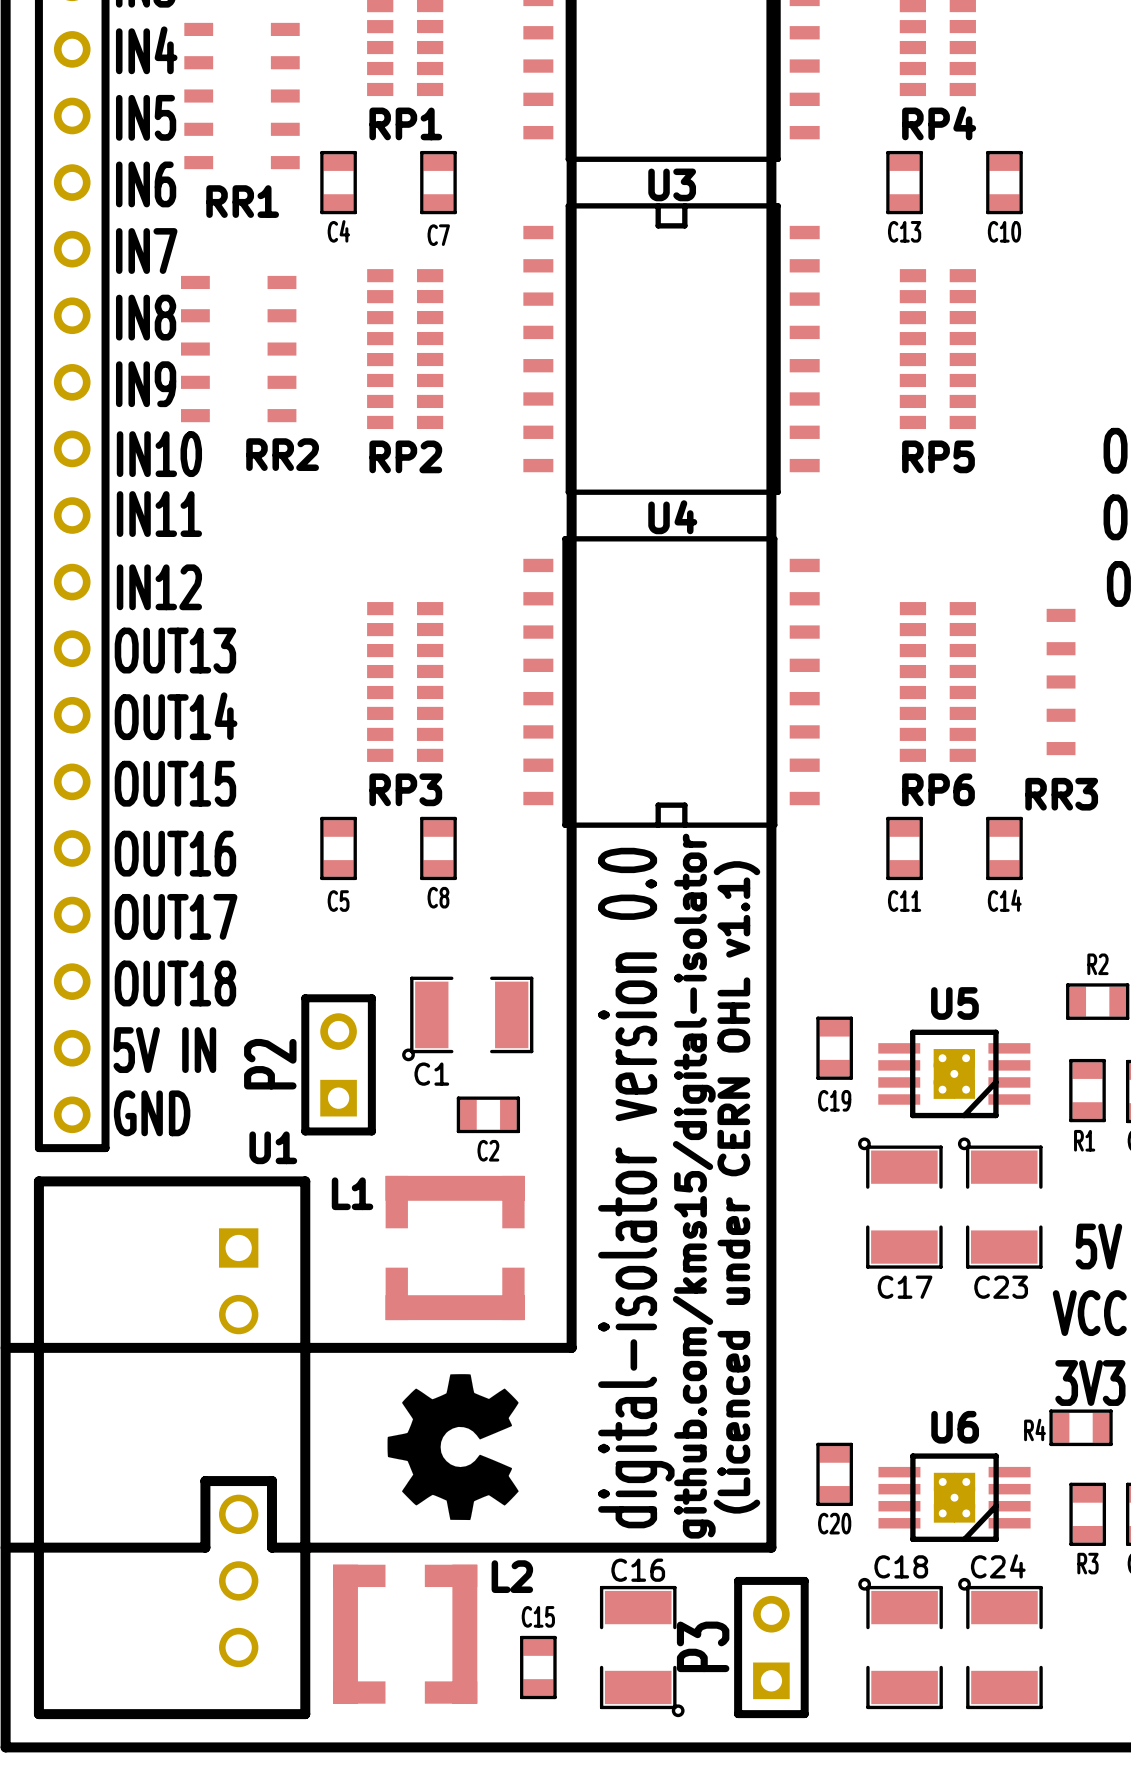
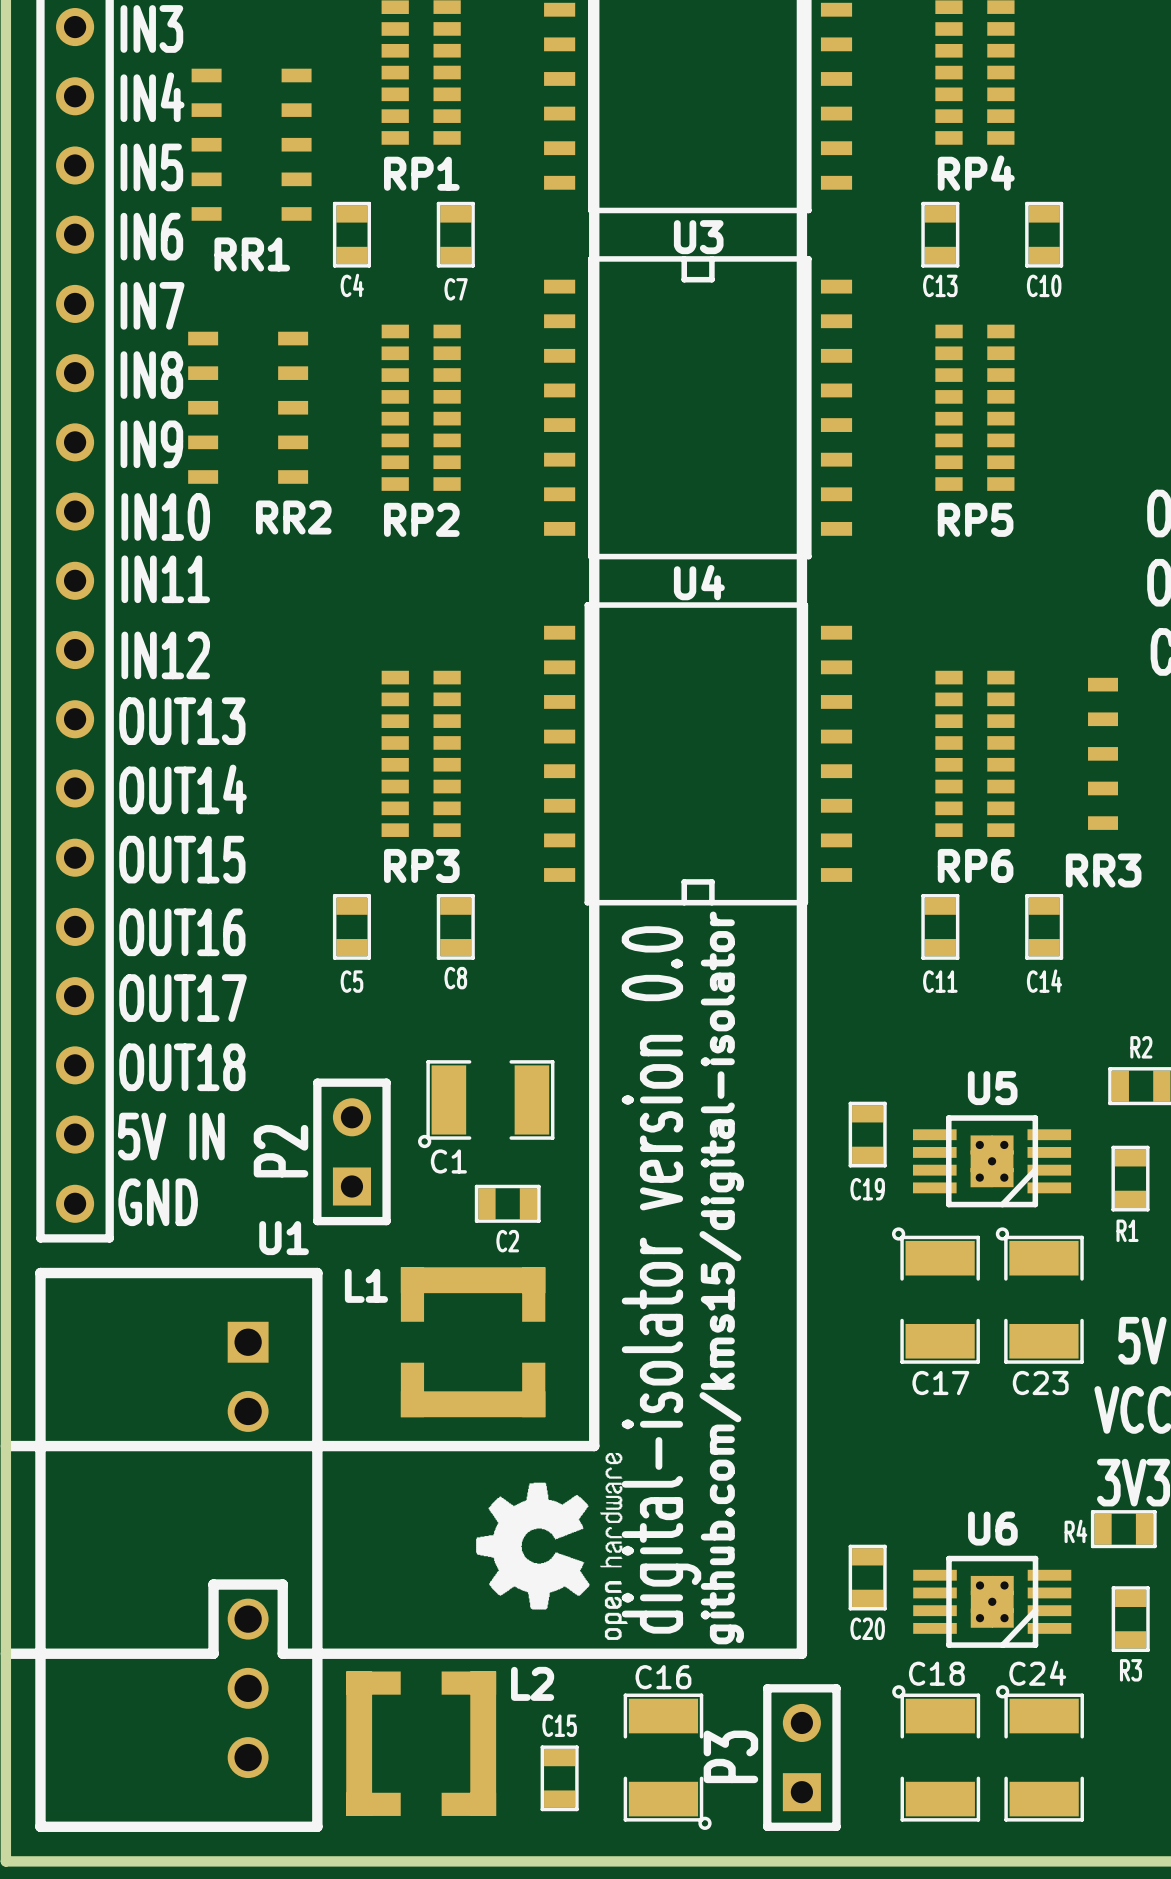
text: (Licenced under CERN OHL v1.1) (736, 1187) -> none
drawing: none -> [476, 1452, 628, 1640]
drawing: [387, 1374, 519, 1521] -> none

